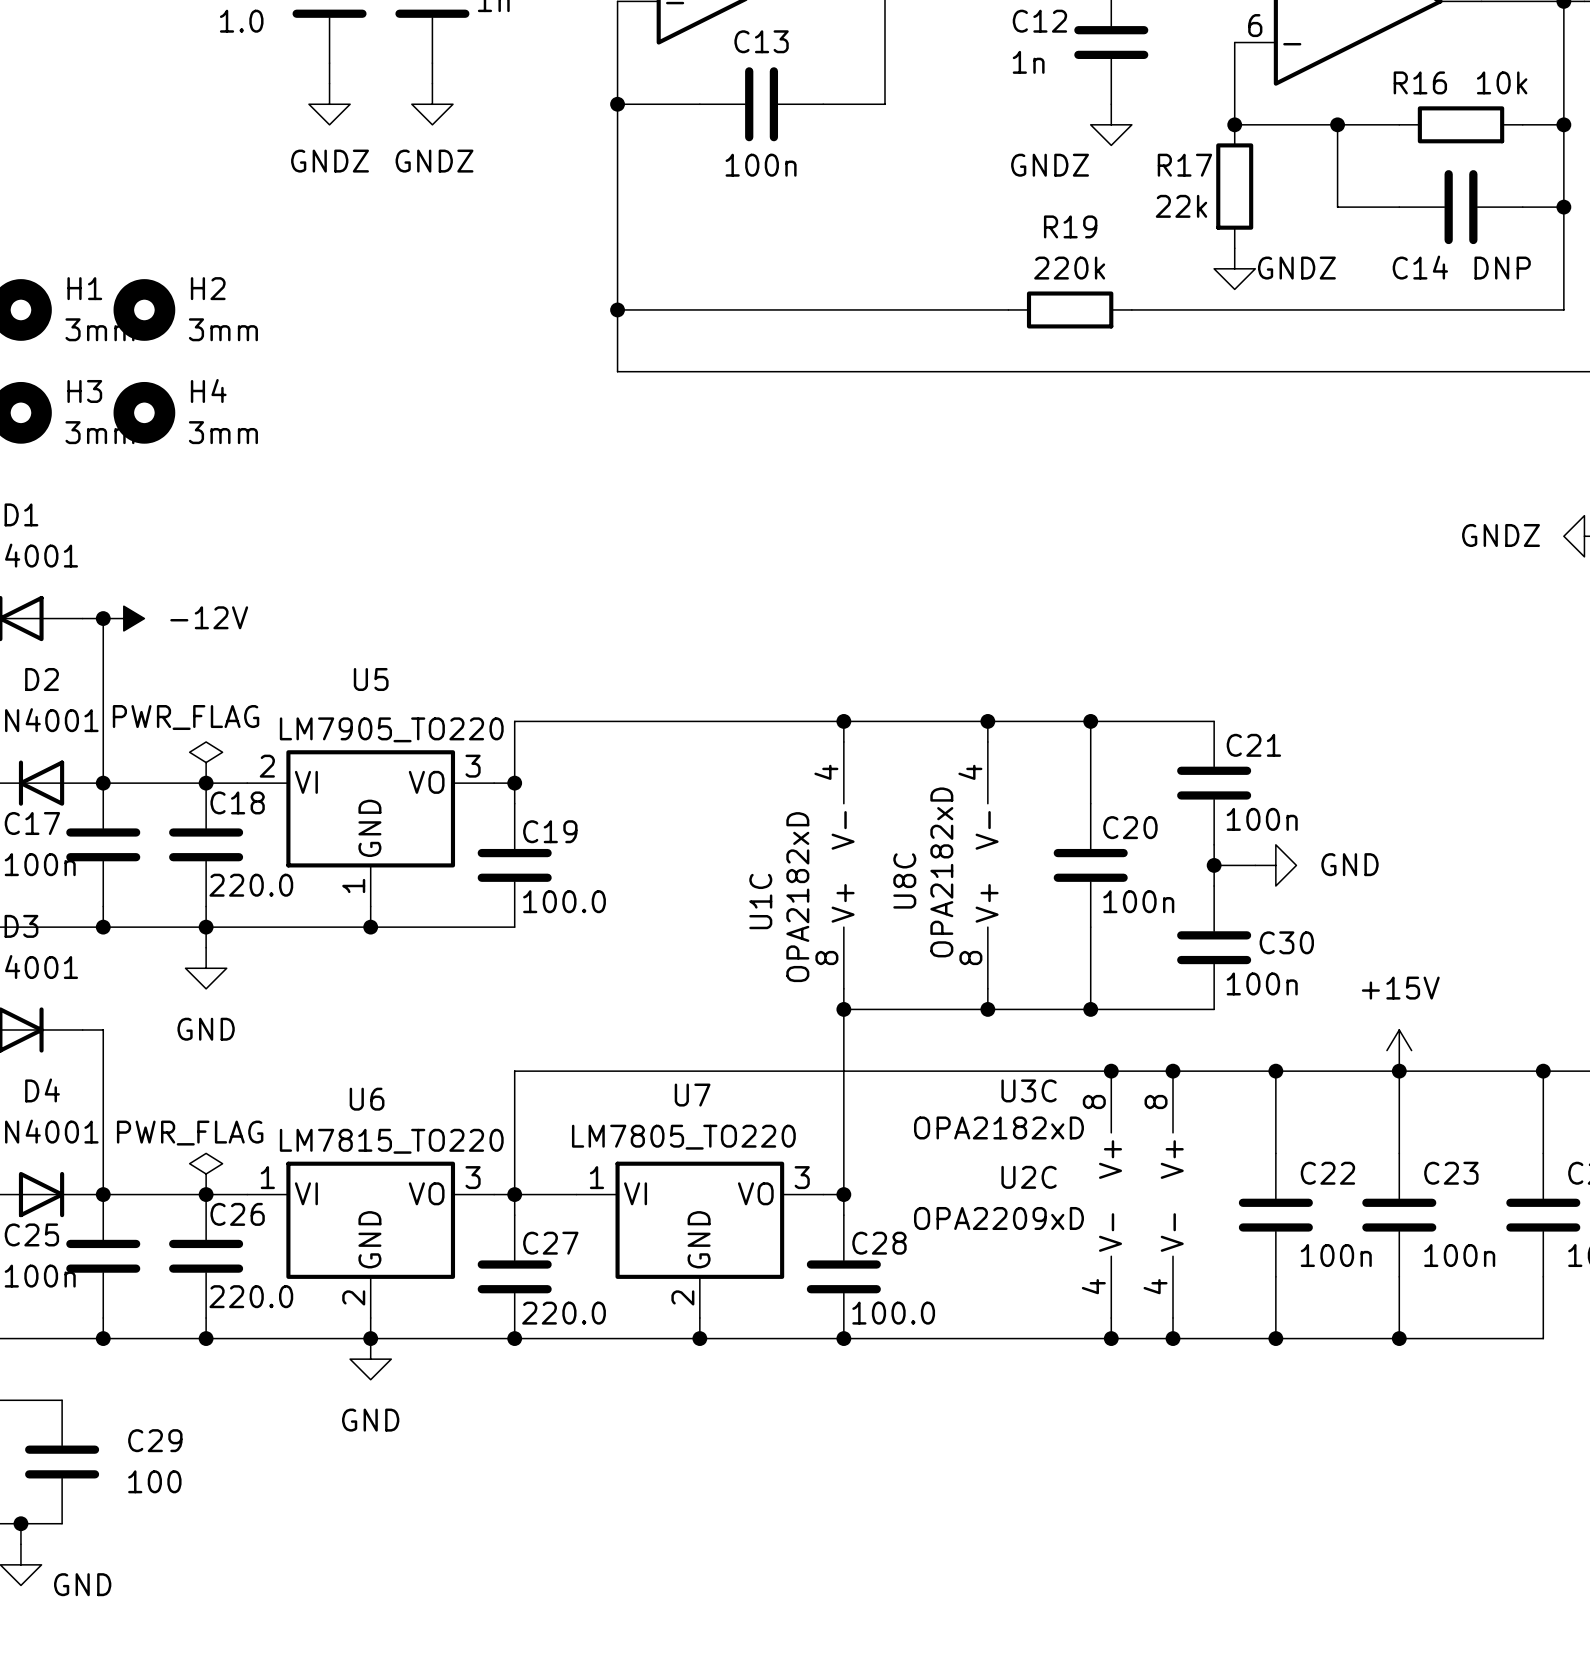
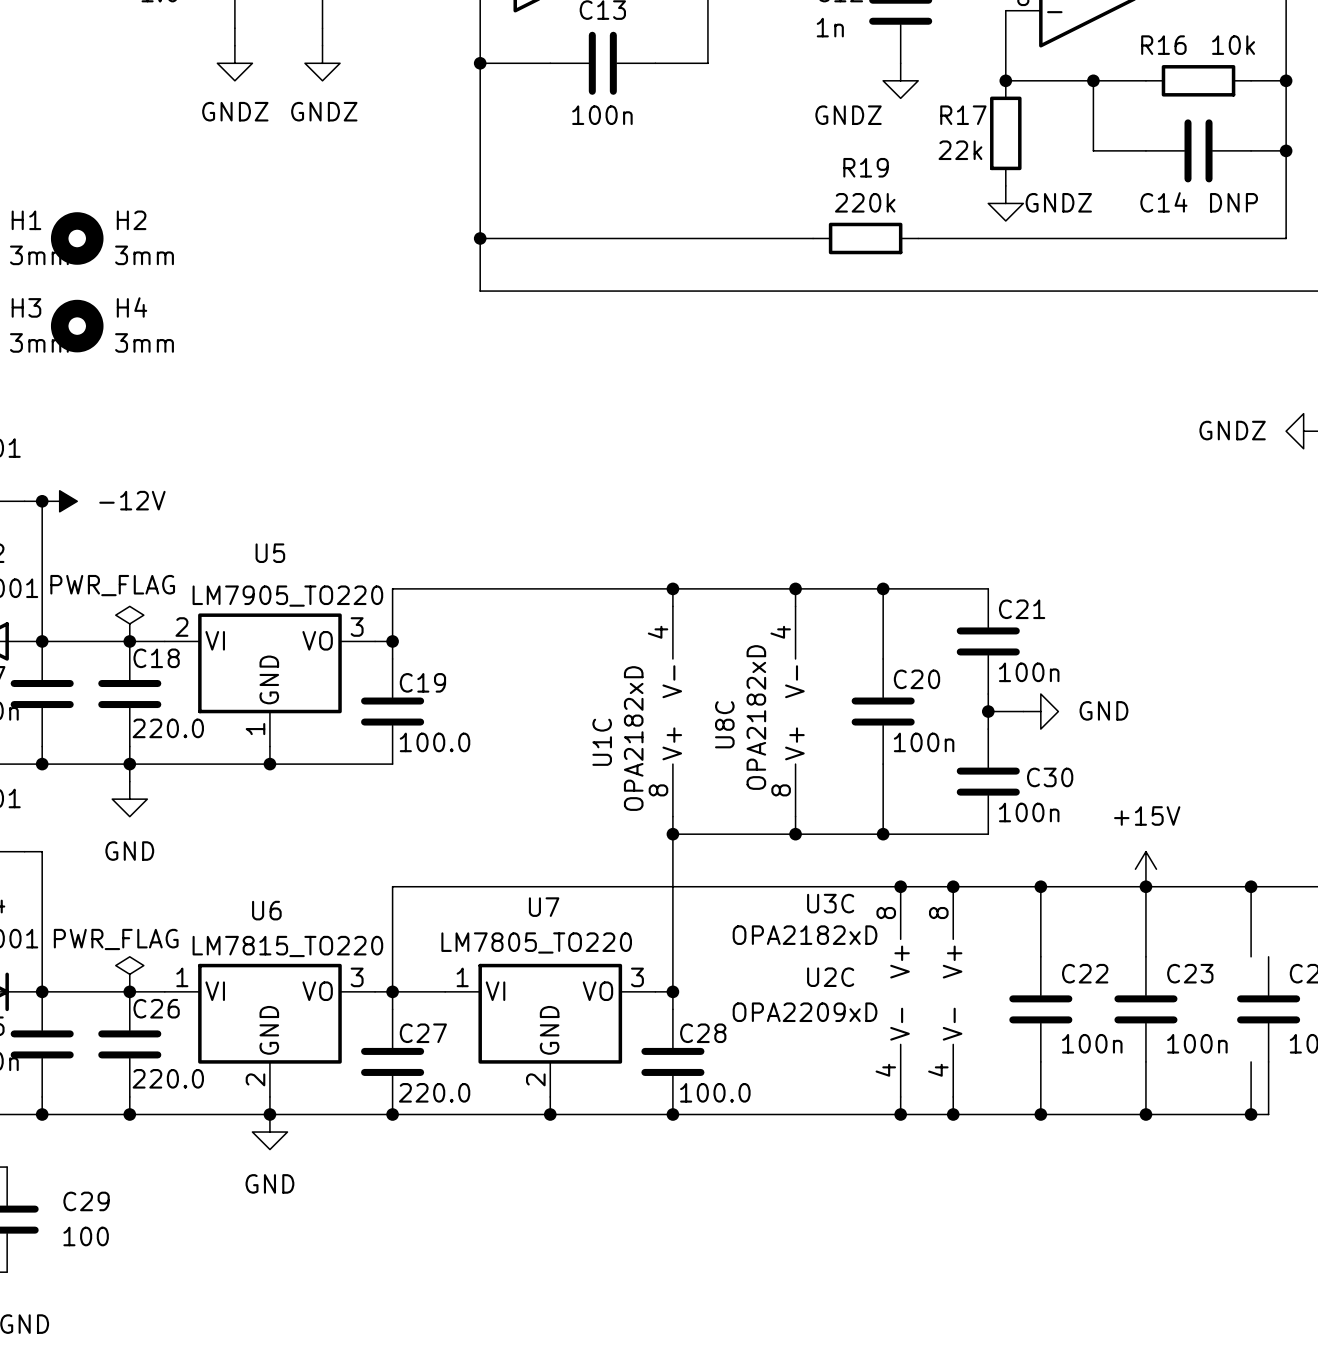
wire: (1543, 1071) (1543, 1153) -> (1251, 886) (1251, 956)
junction position: (1543, 1071) -> (1251, 886)
wire: none -> (1251, 1061) (1251, 1114)
junction: none -> (1251, 1114)

